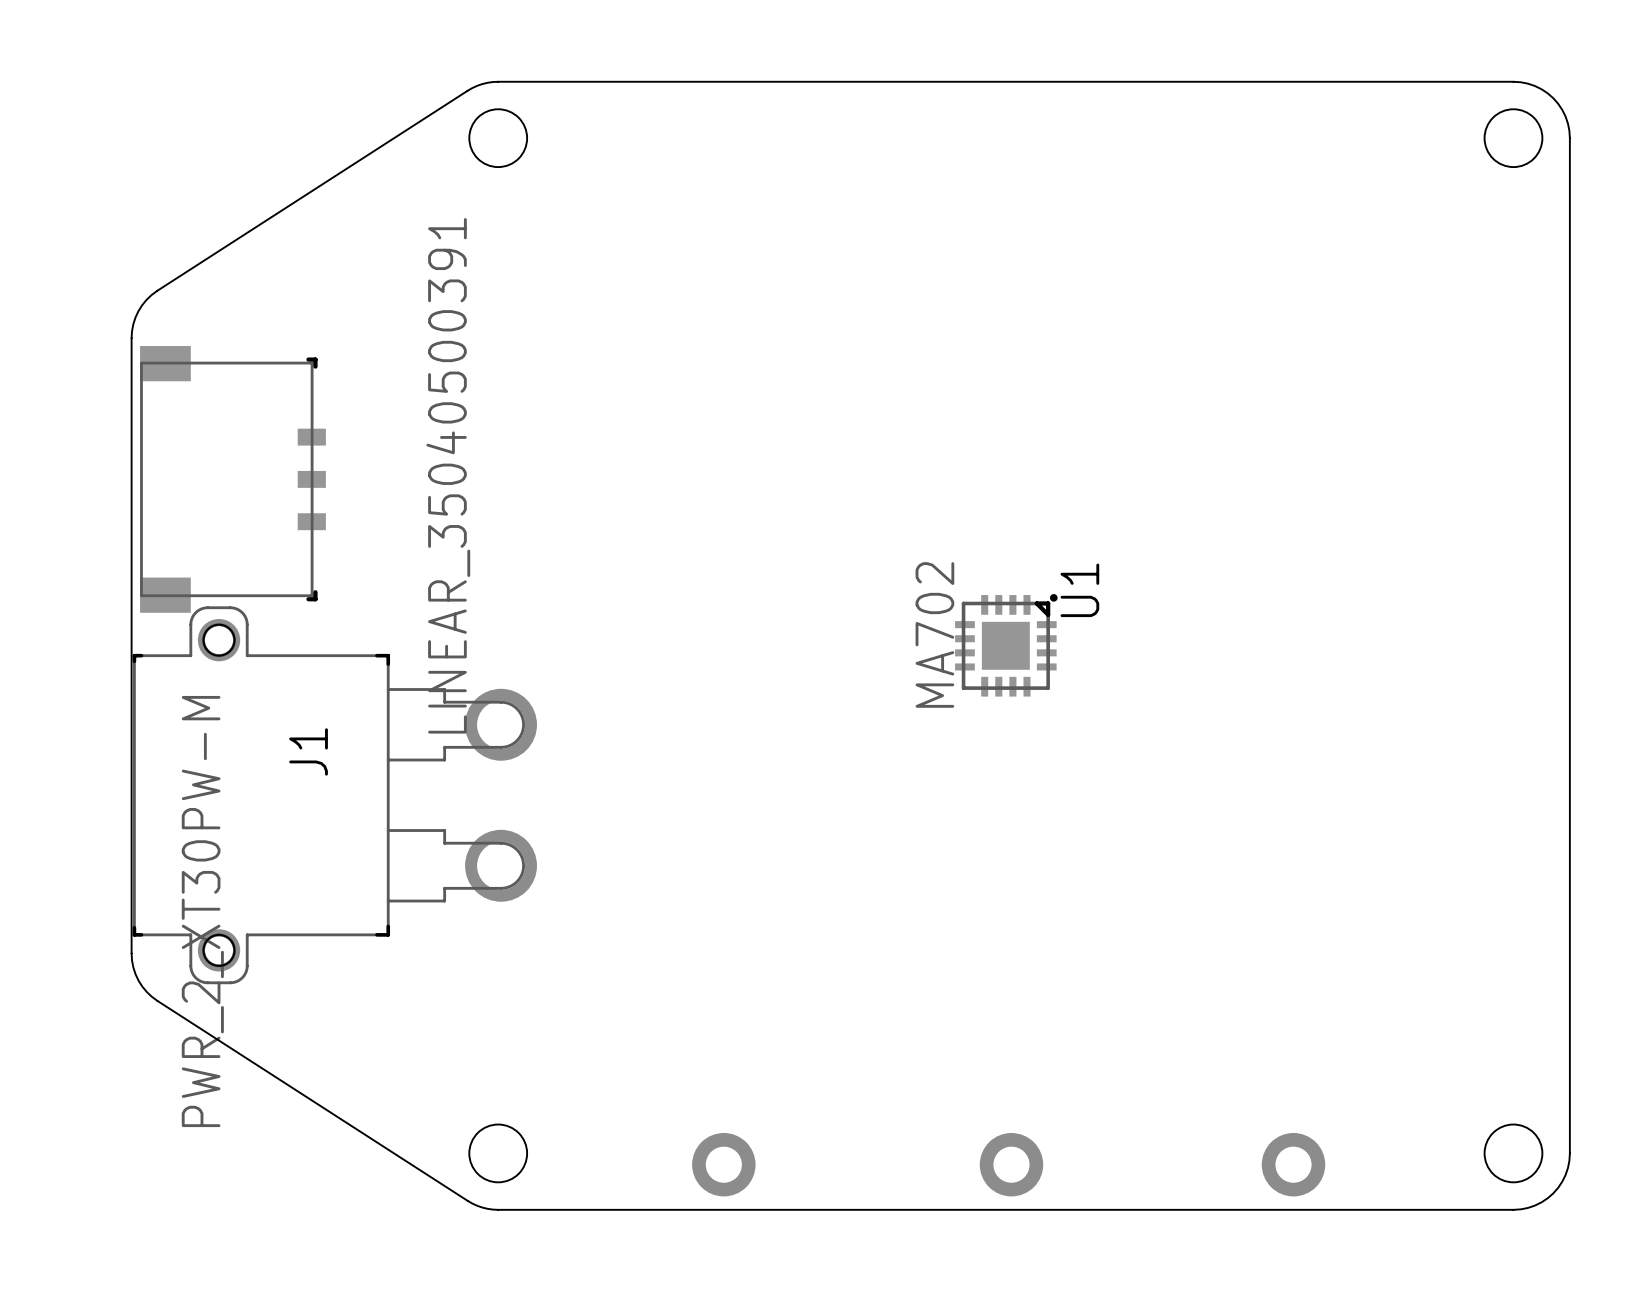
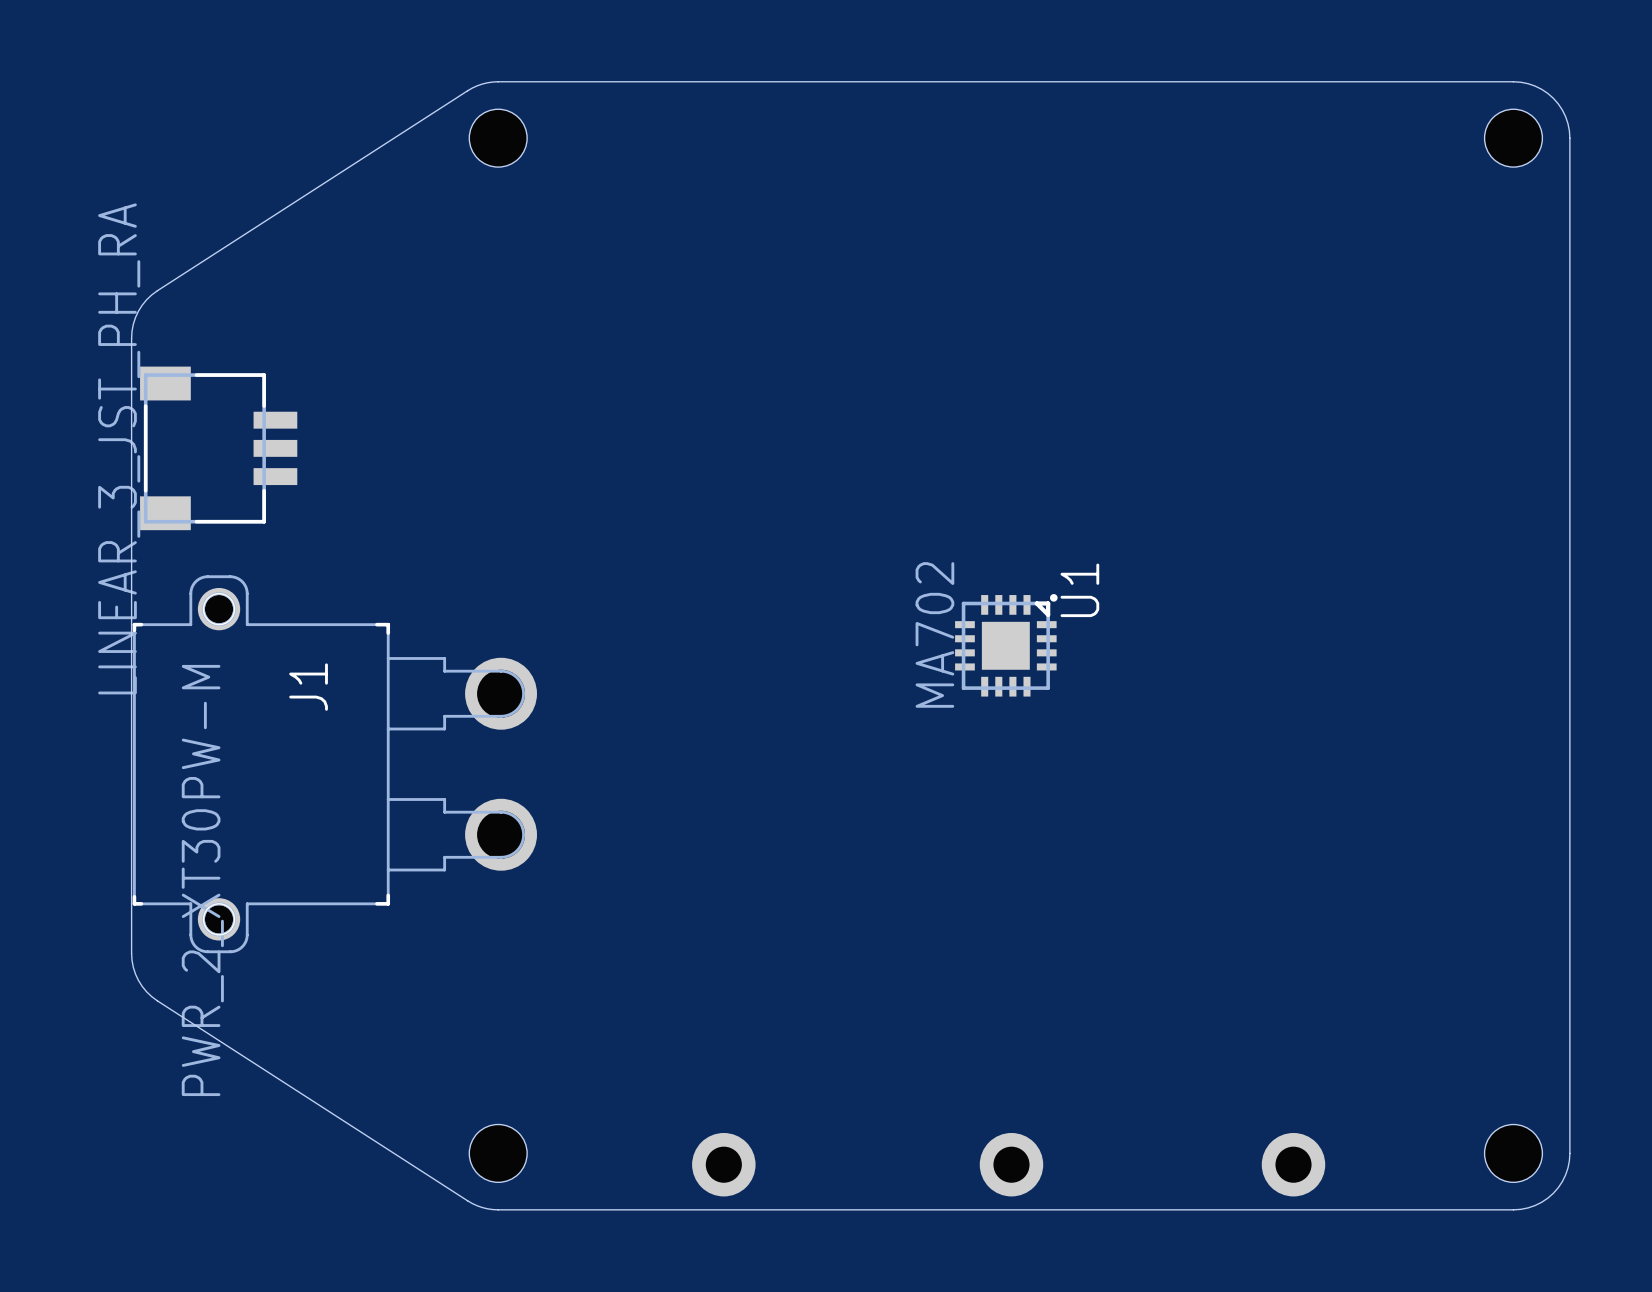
part: none -> LINEAR_3_JST_PH_RA (218, 448)
part: LINEAR_35040500391 (232, 479) -> none
J1 name position: J1 (308, 751) -> J1 (308, 687)
J1 position: (334, 795) -> (334, 764)

